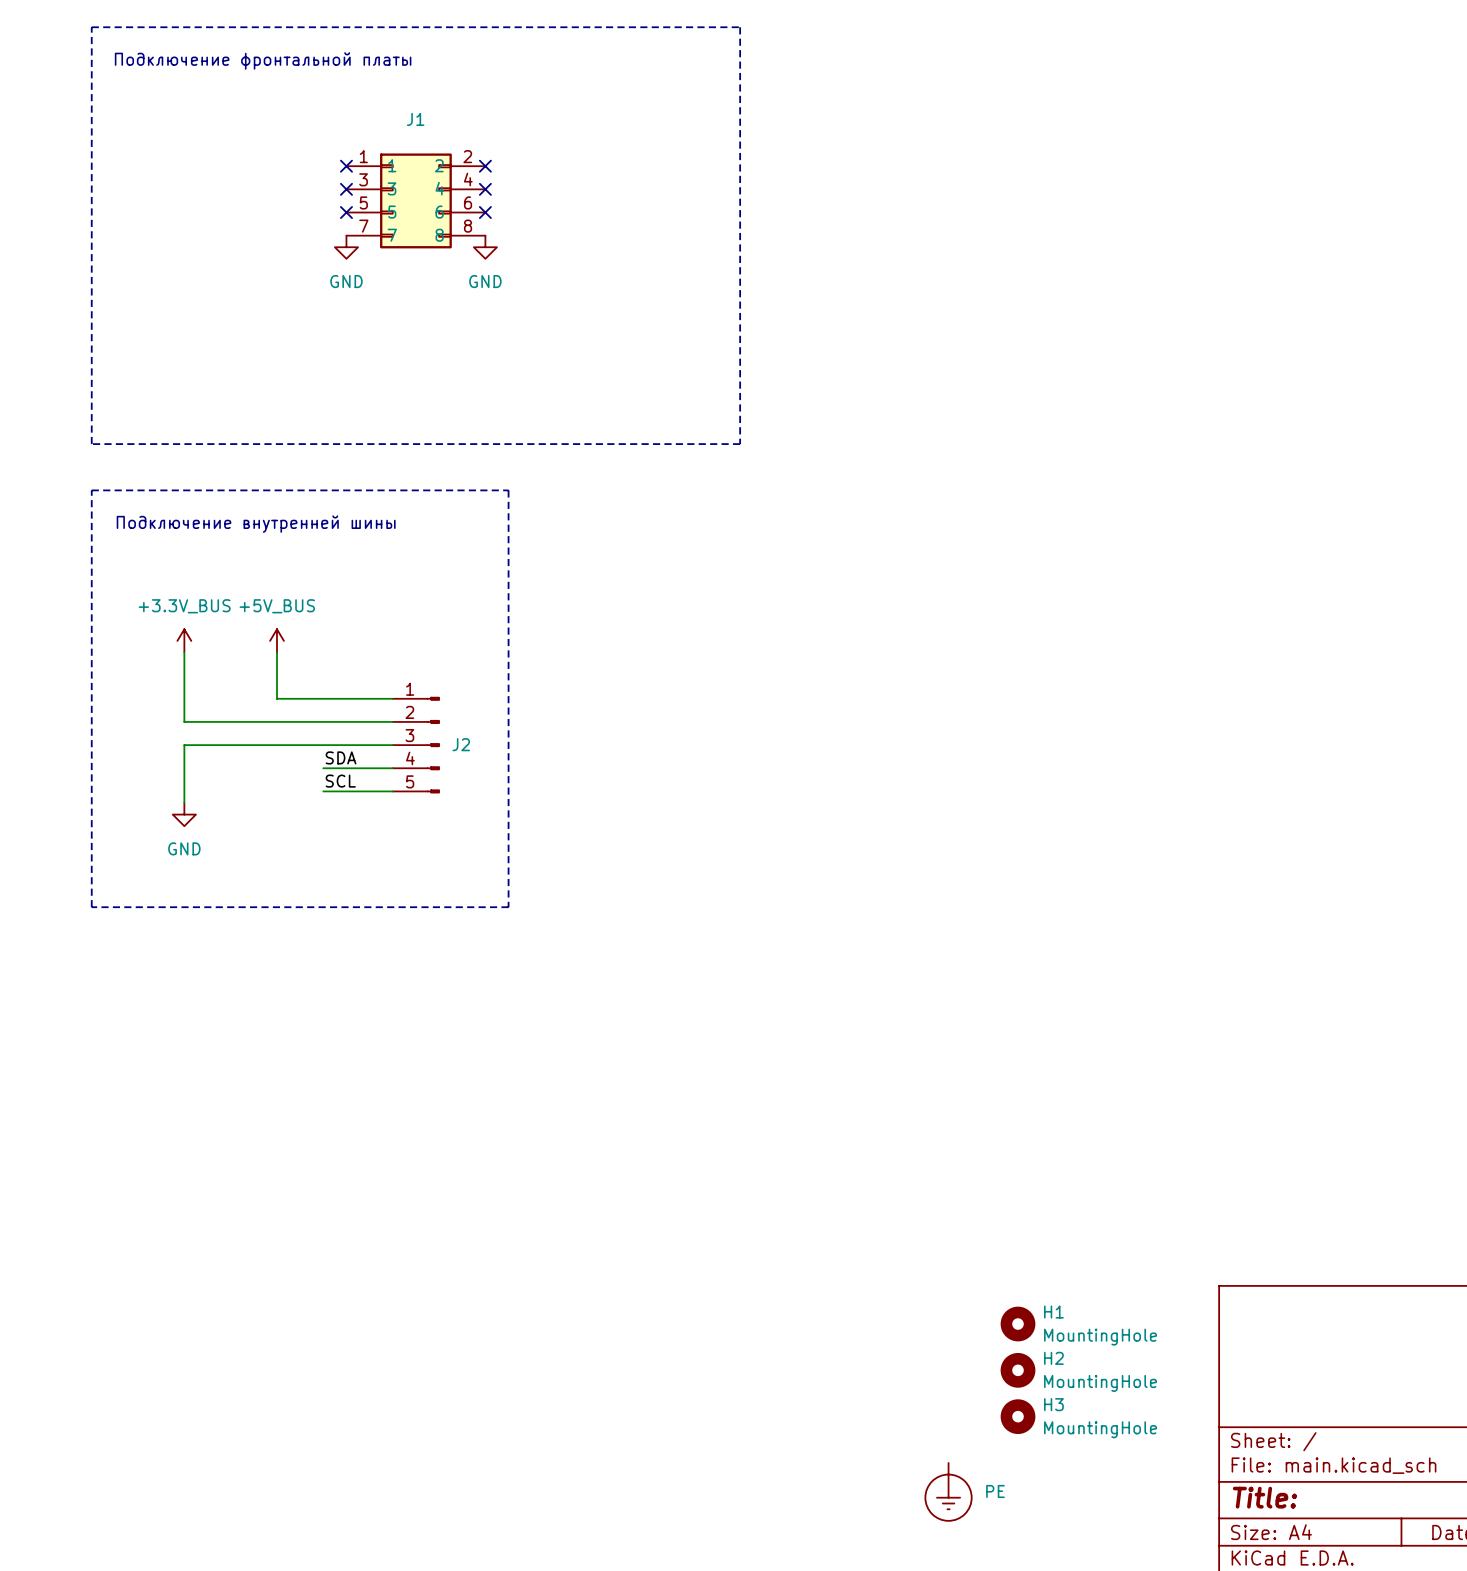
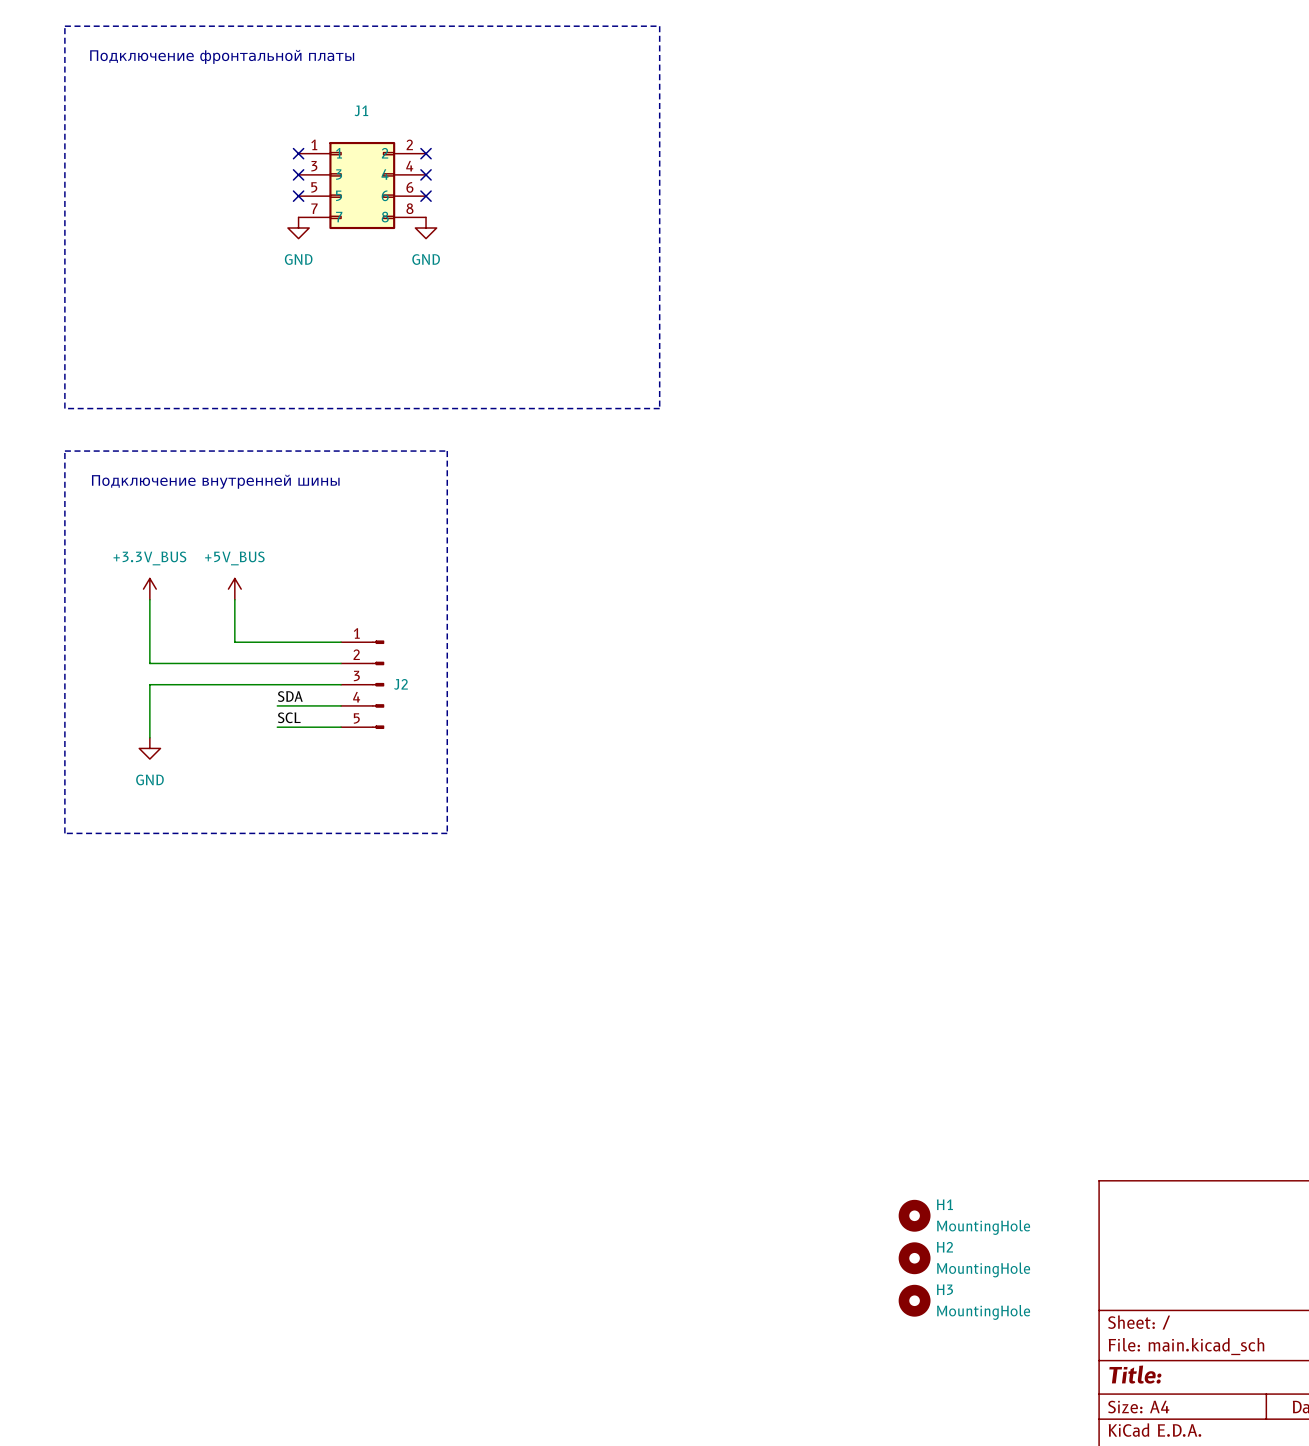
part: PE (948, 1491) -> none

